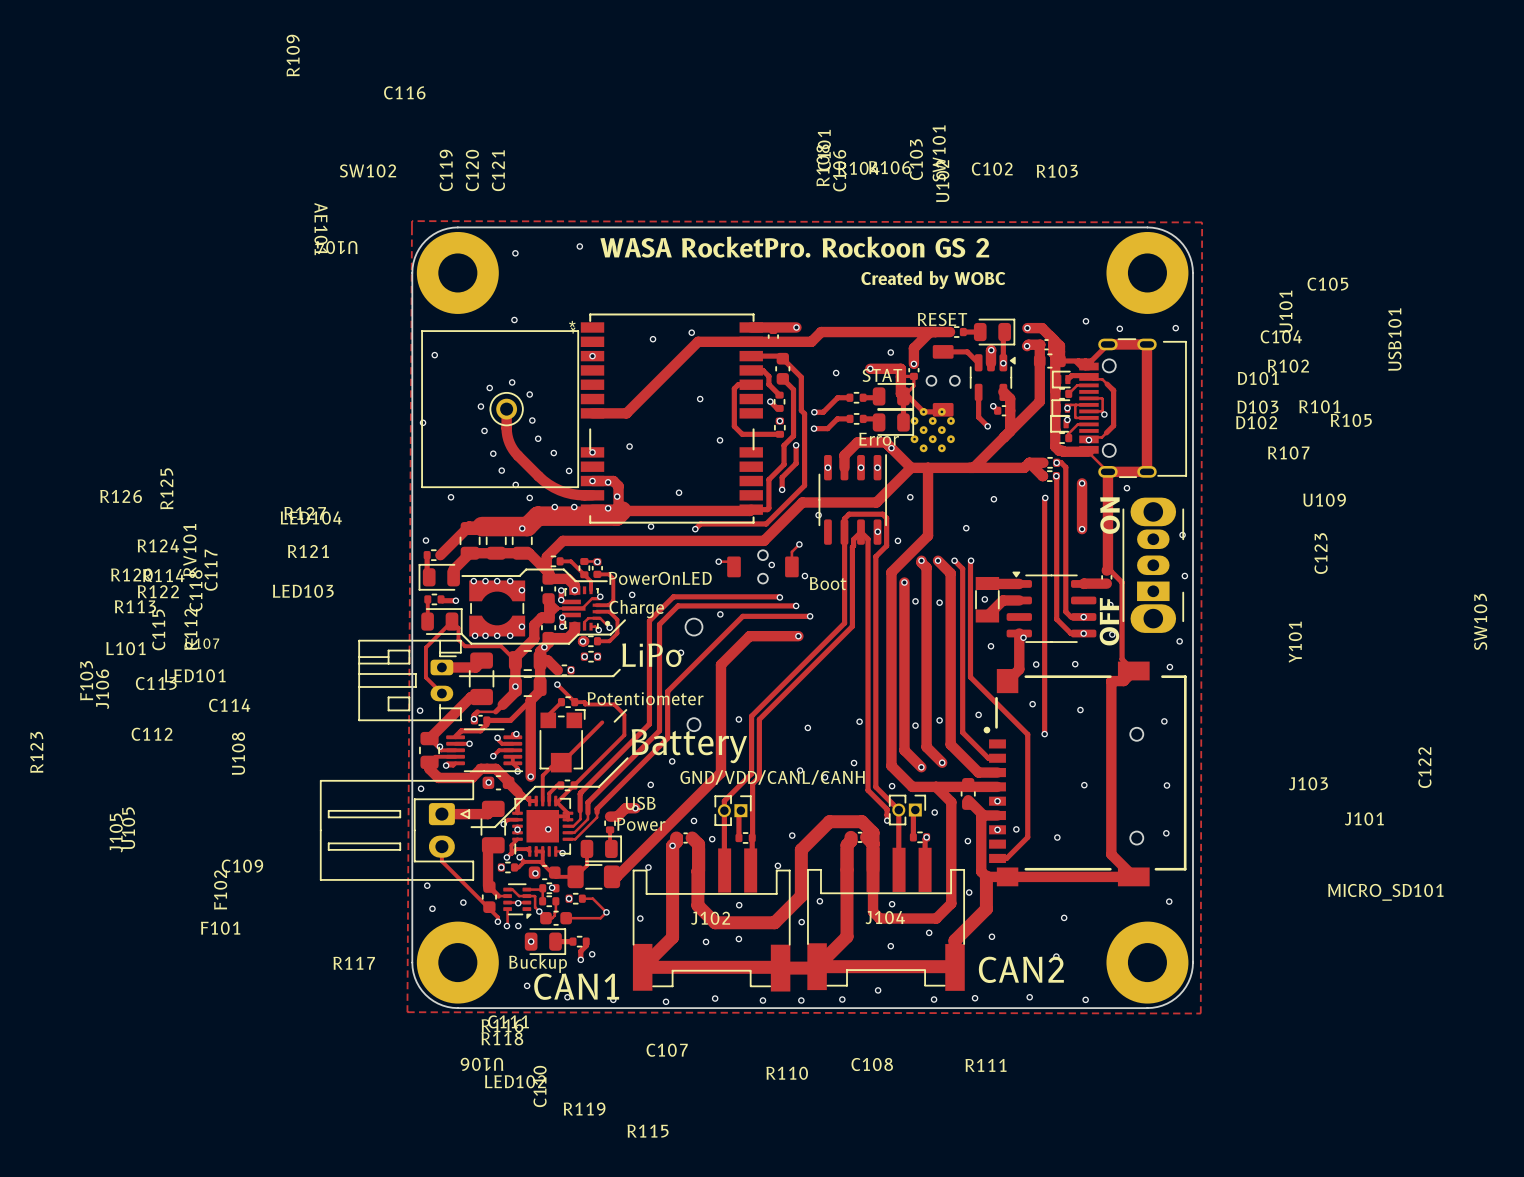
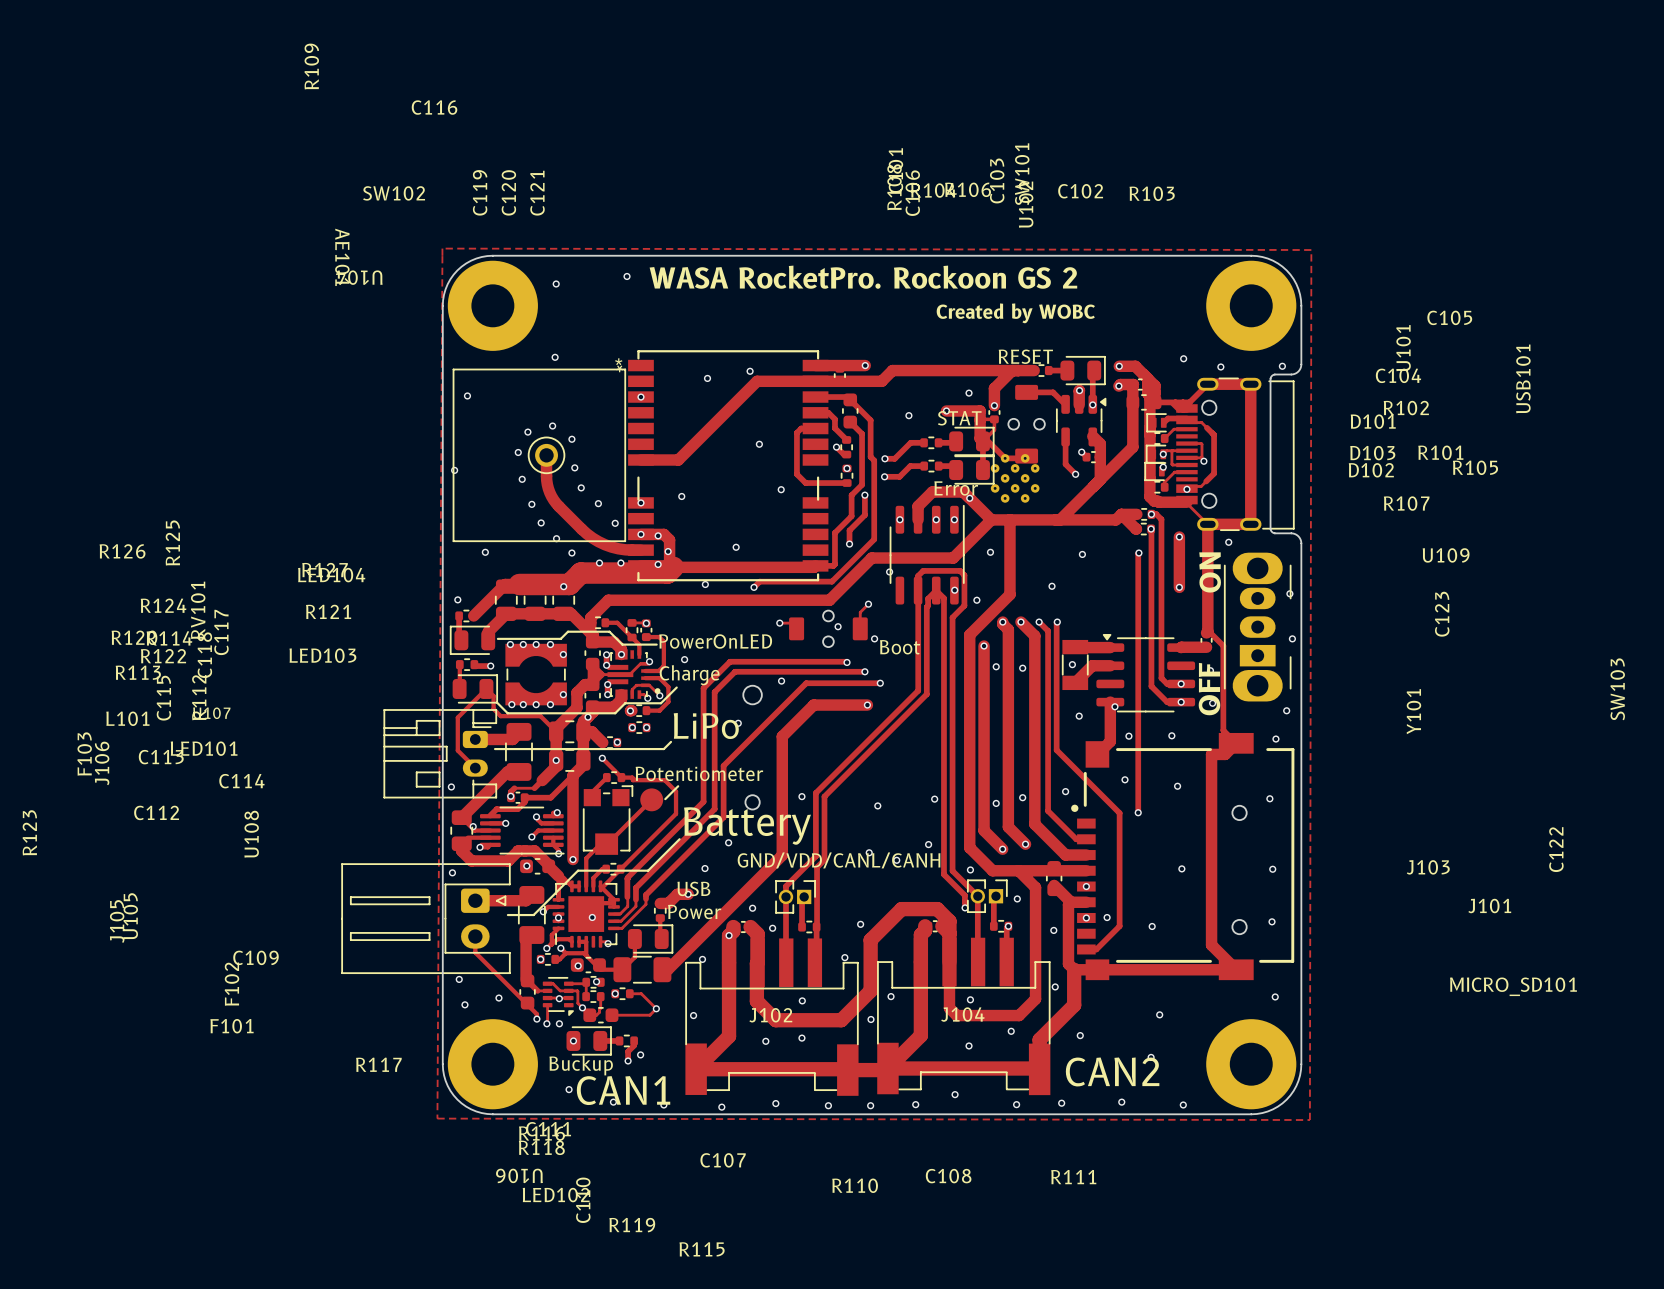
part footprint: [411, 227, 1194, 1009] -> [442, 255, 1302, 1115]
part: none -> (651, 799)

